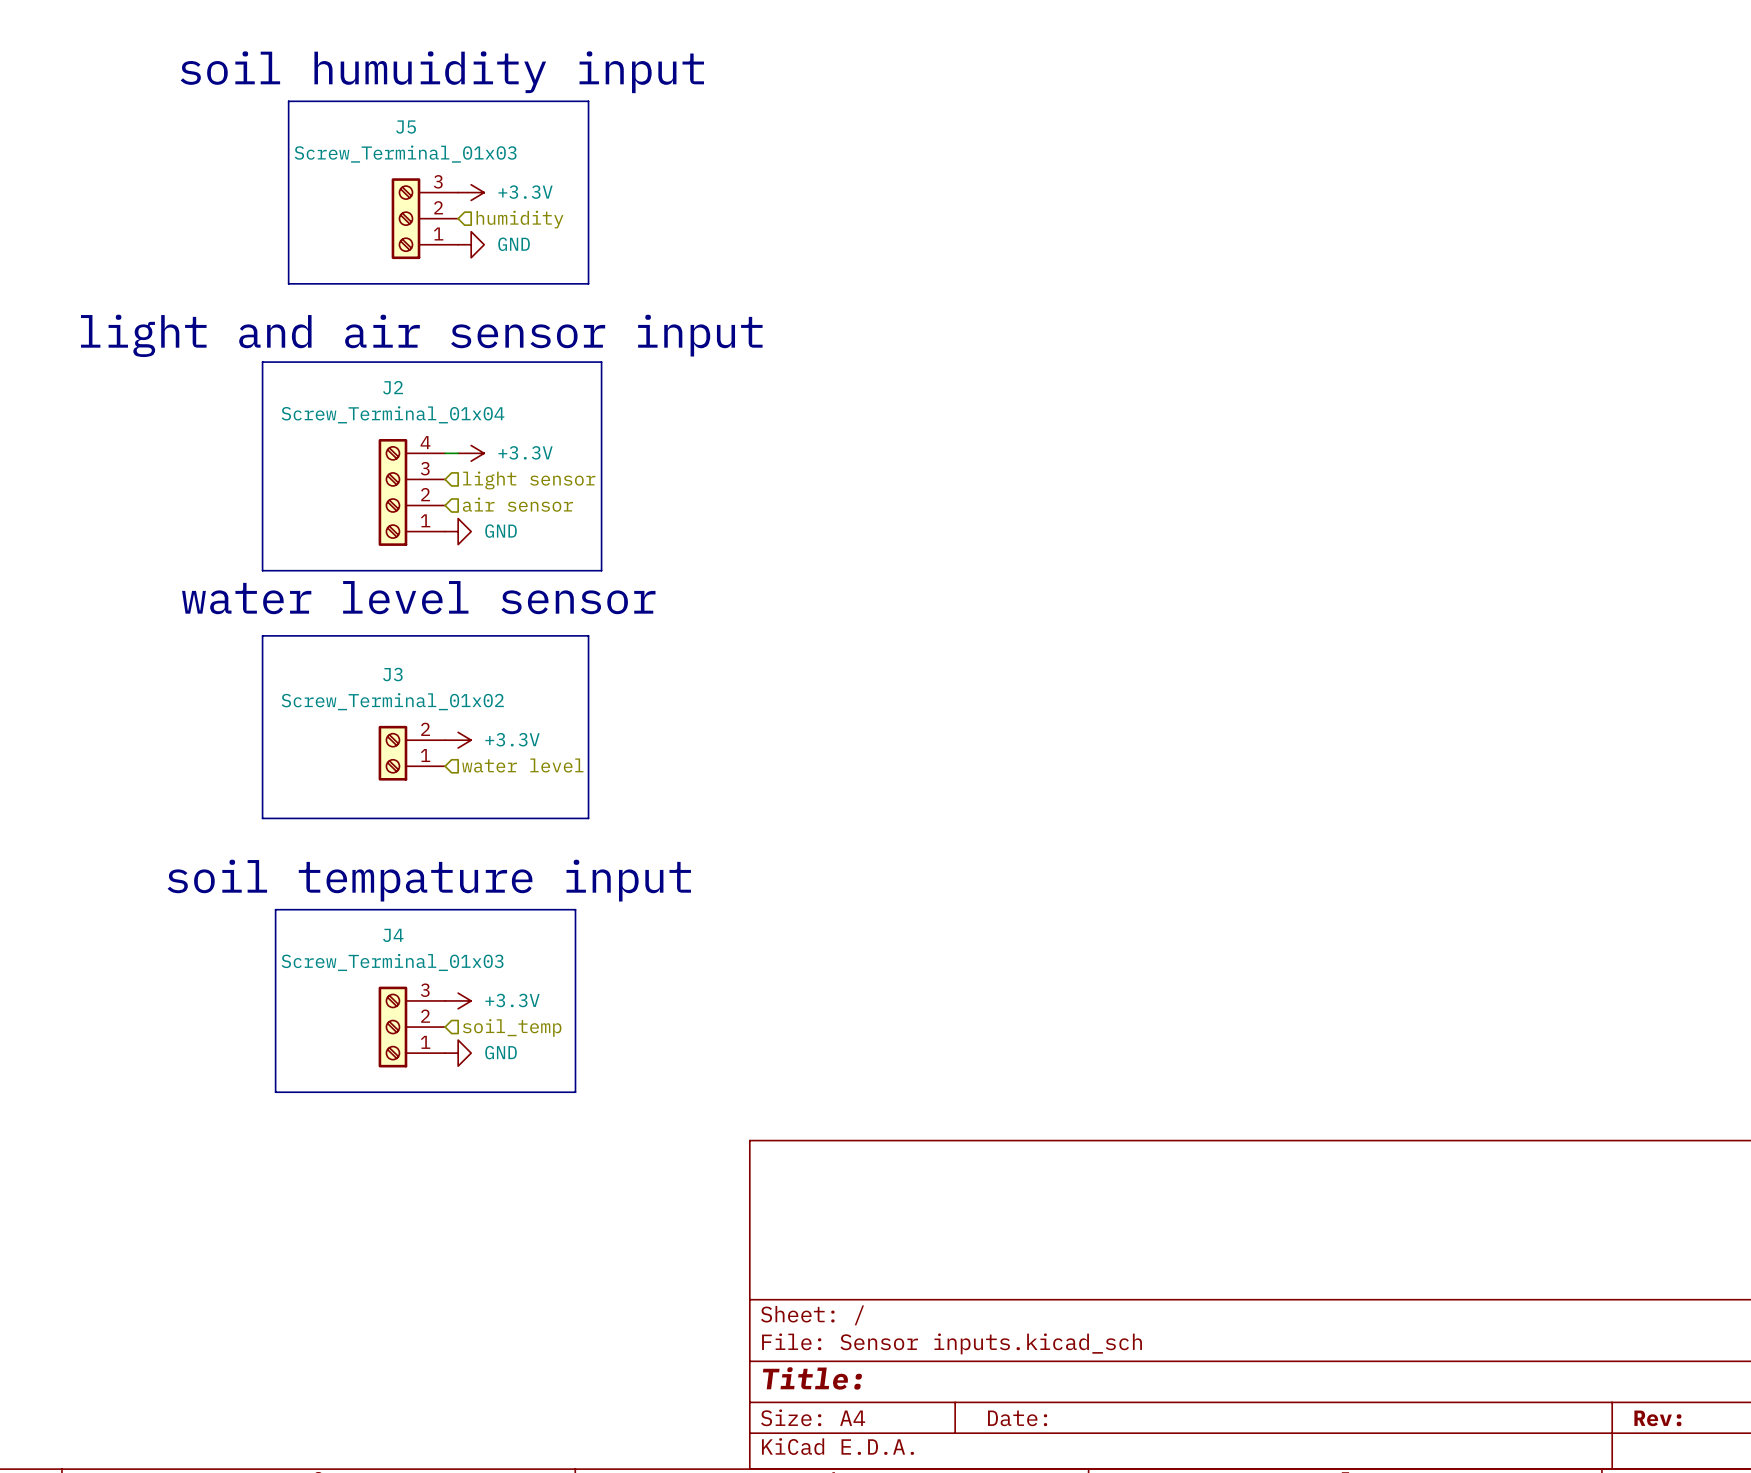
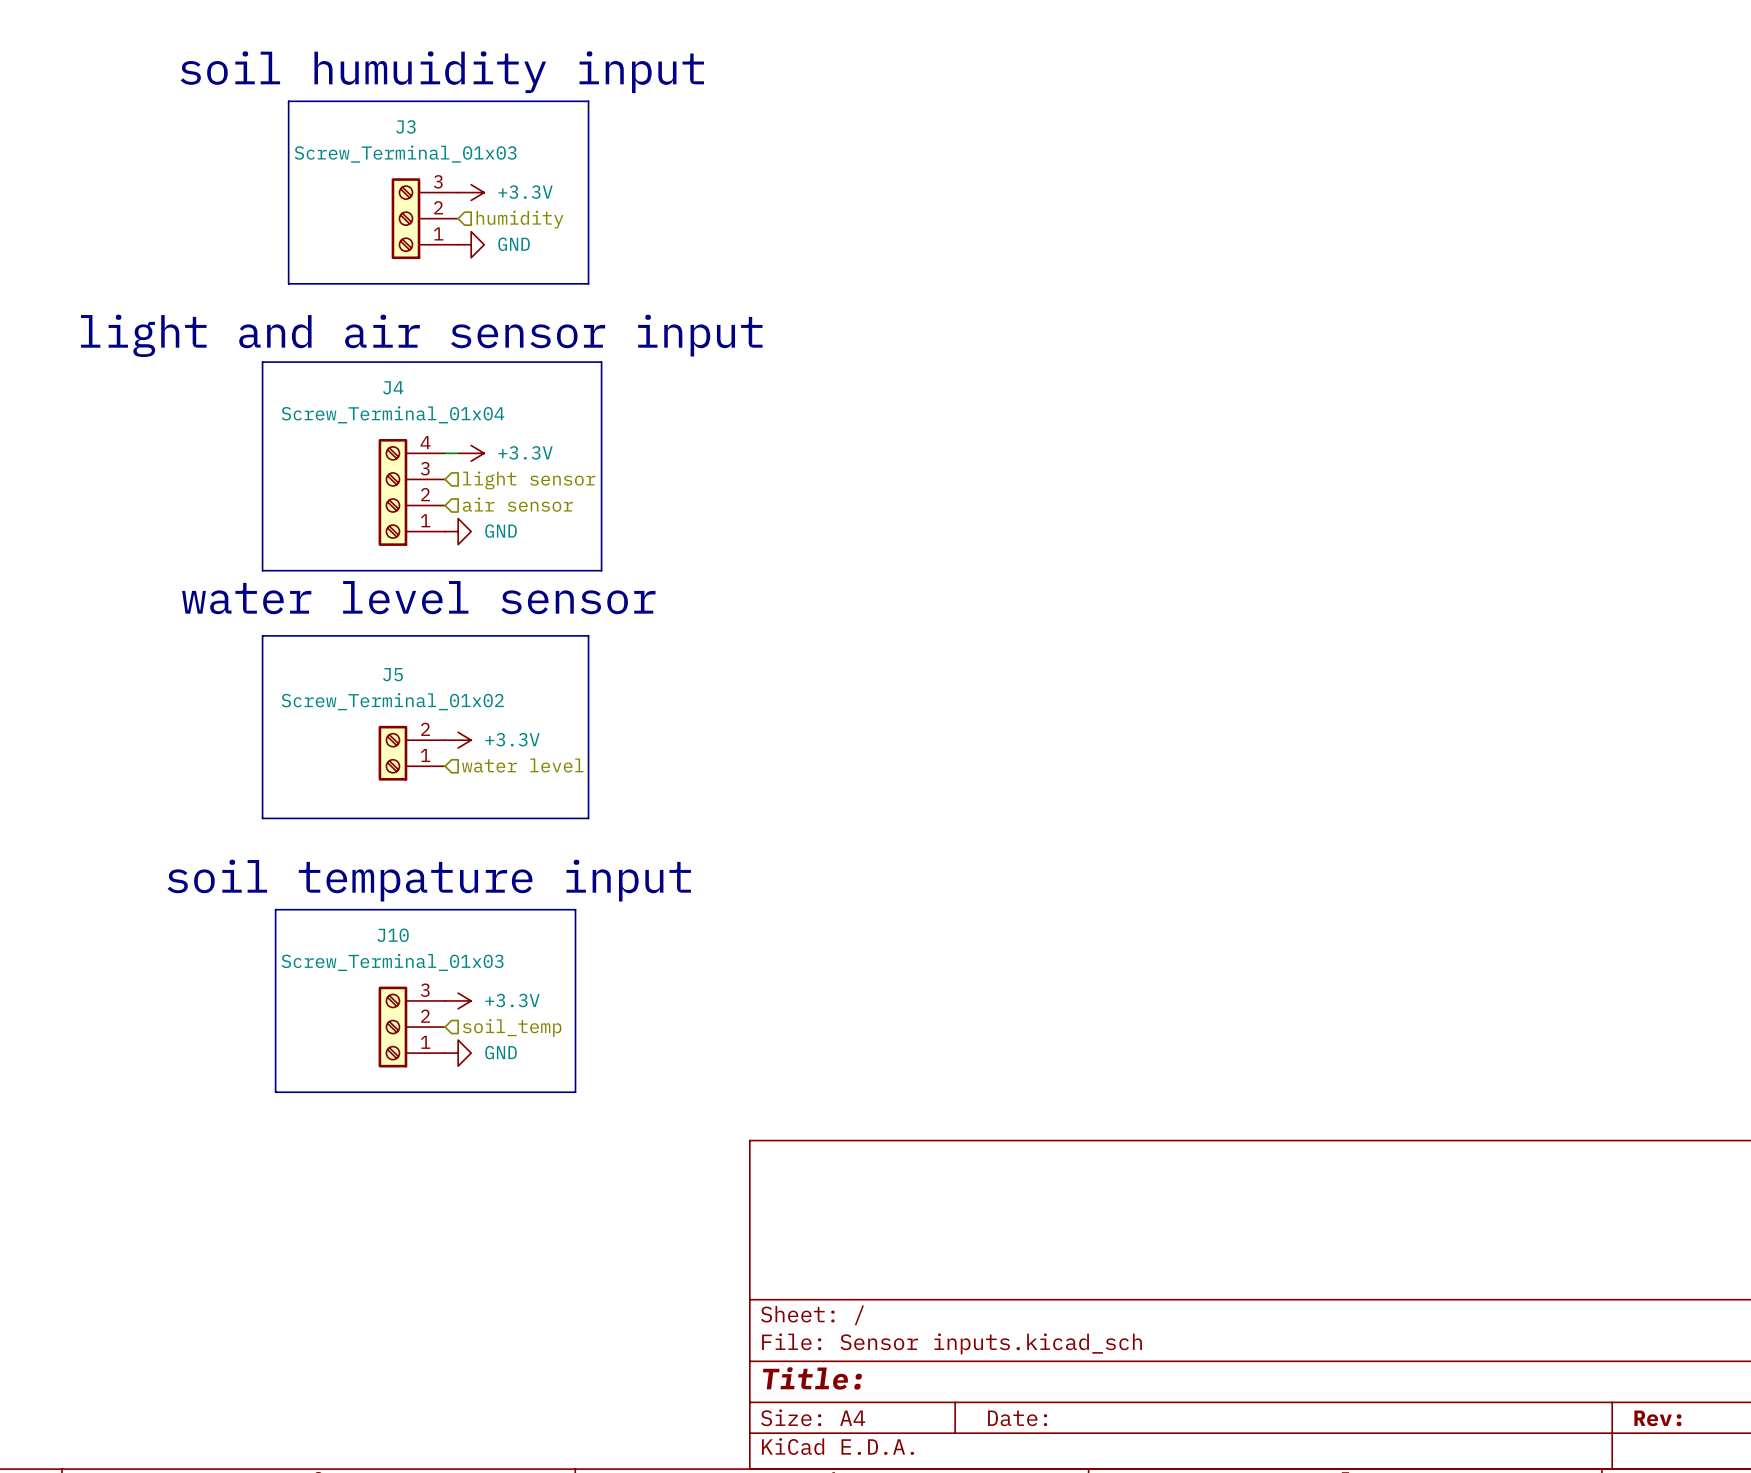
J5 name: J5 (406, 127) -> J3 (405, 126)
J2 name: J2 (393, 387) -> J4 (393, 387)
J3 name: J3 (392, 674) -> J5 (393, 674)
J4 name: J4 (393, 935) -> J10 (393, 935)

